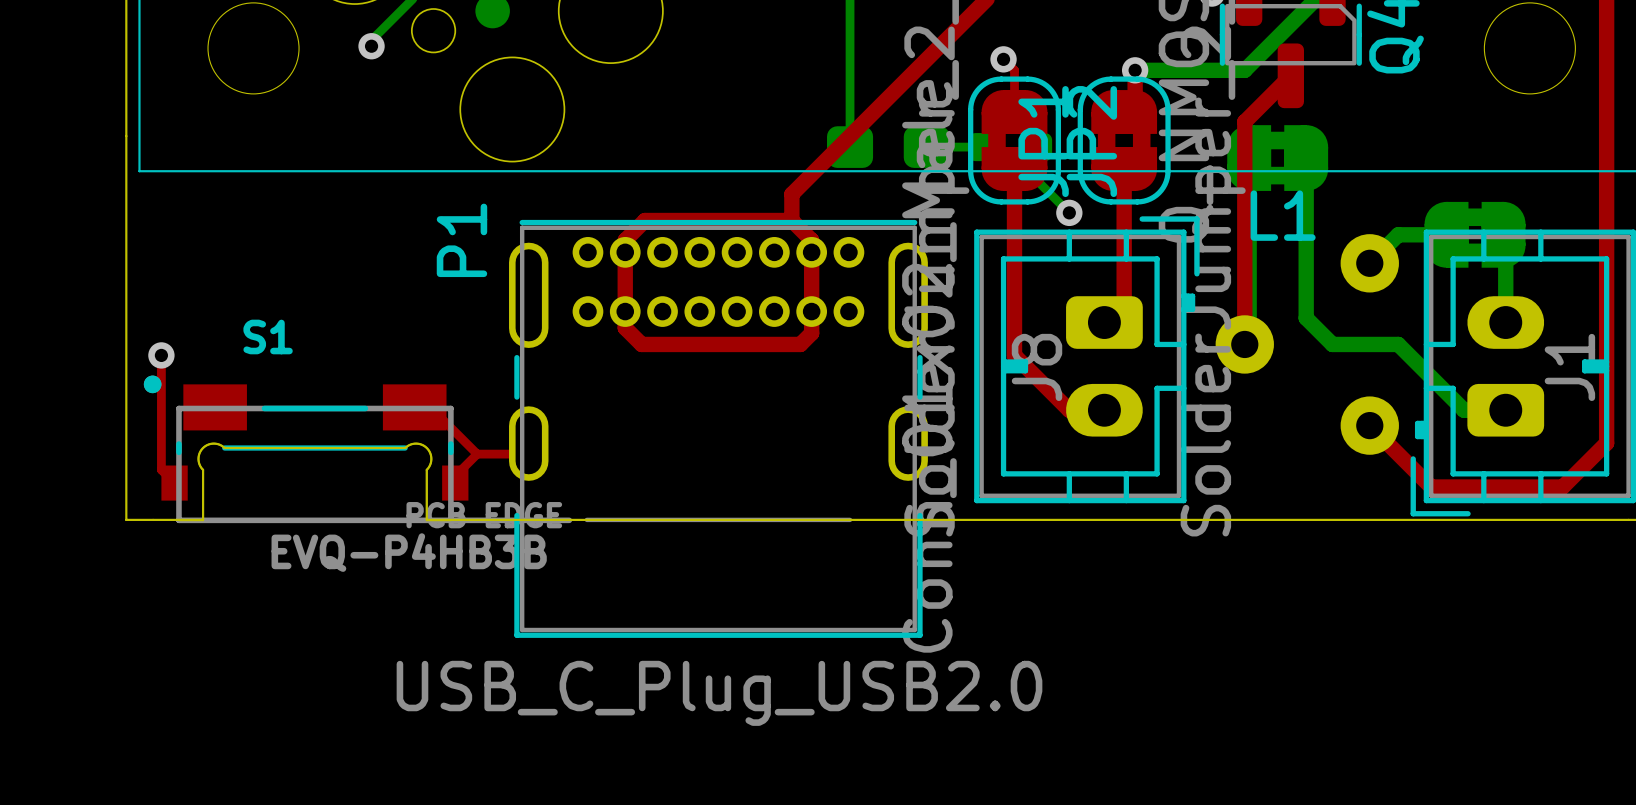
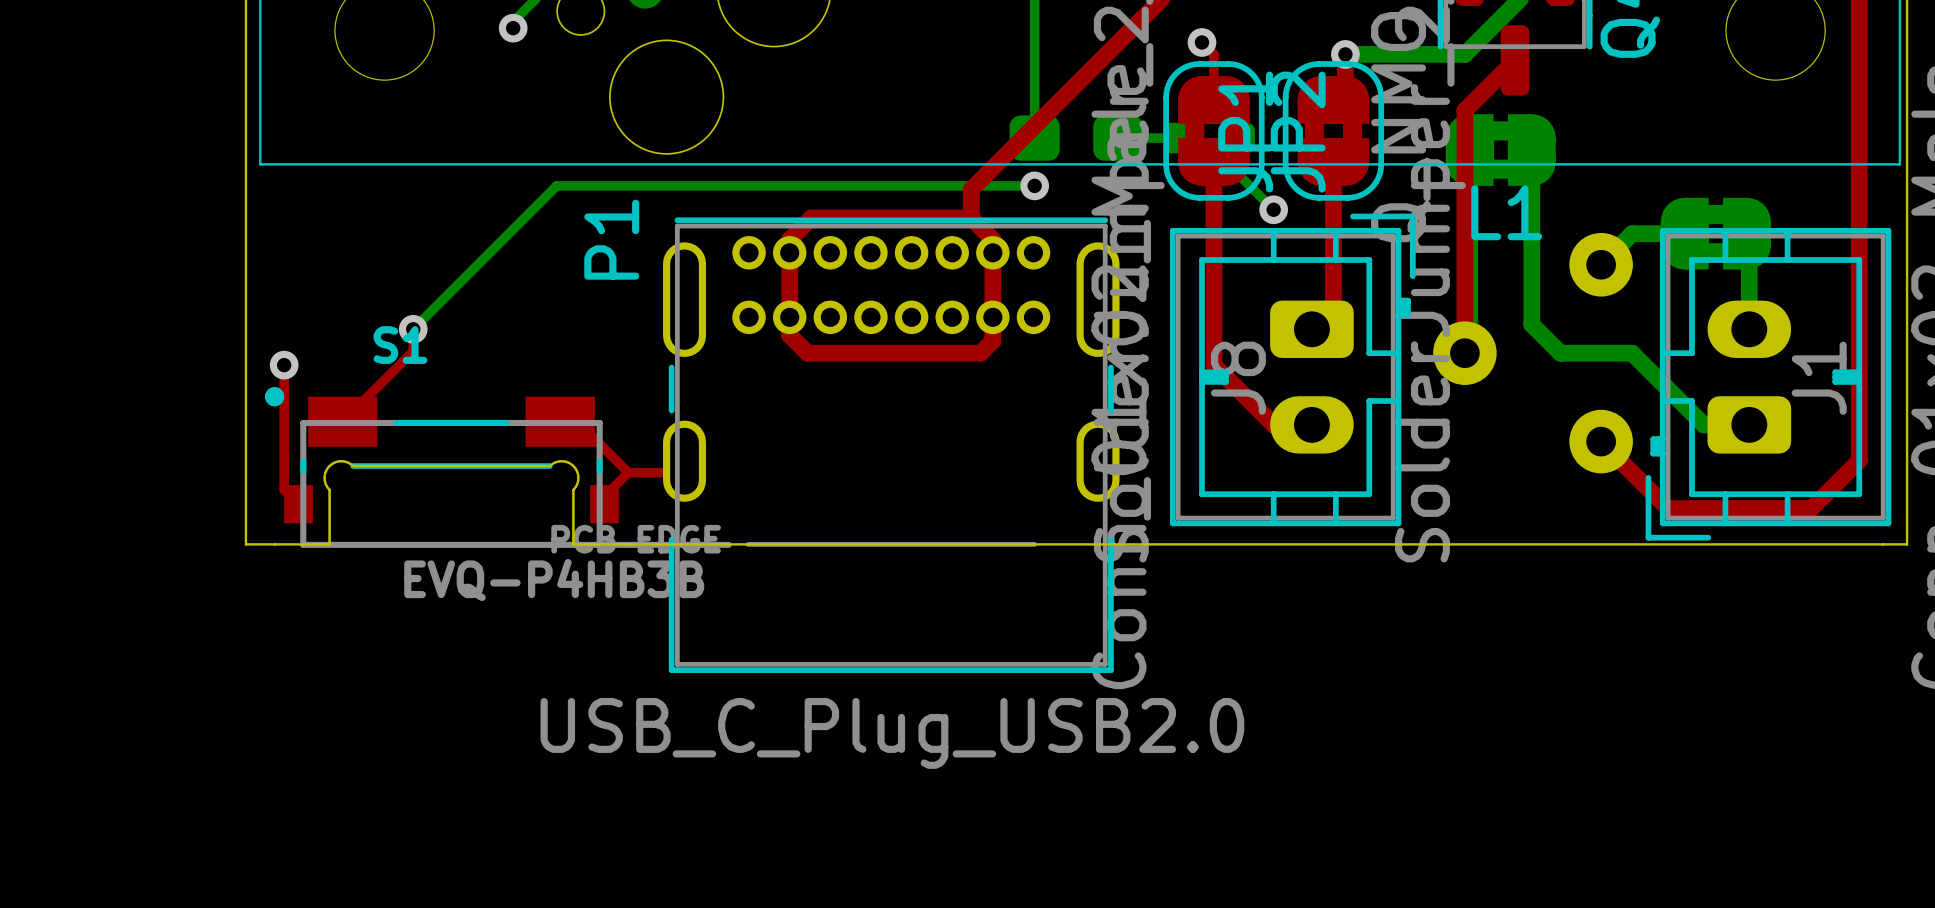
bottom track: none -> (1034, 185) (556, 185) (413, 329)
via: none -> (1034, 185)
top track: none -> (413, 329) (413, 351) (342, 421)
via: none -> (413, 329)

